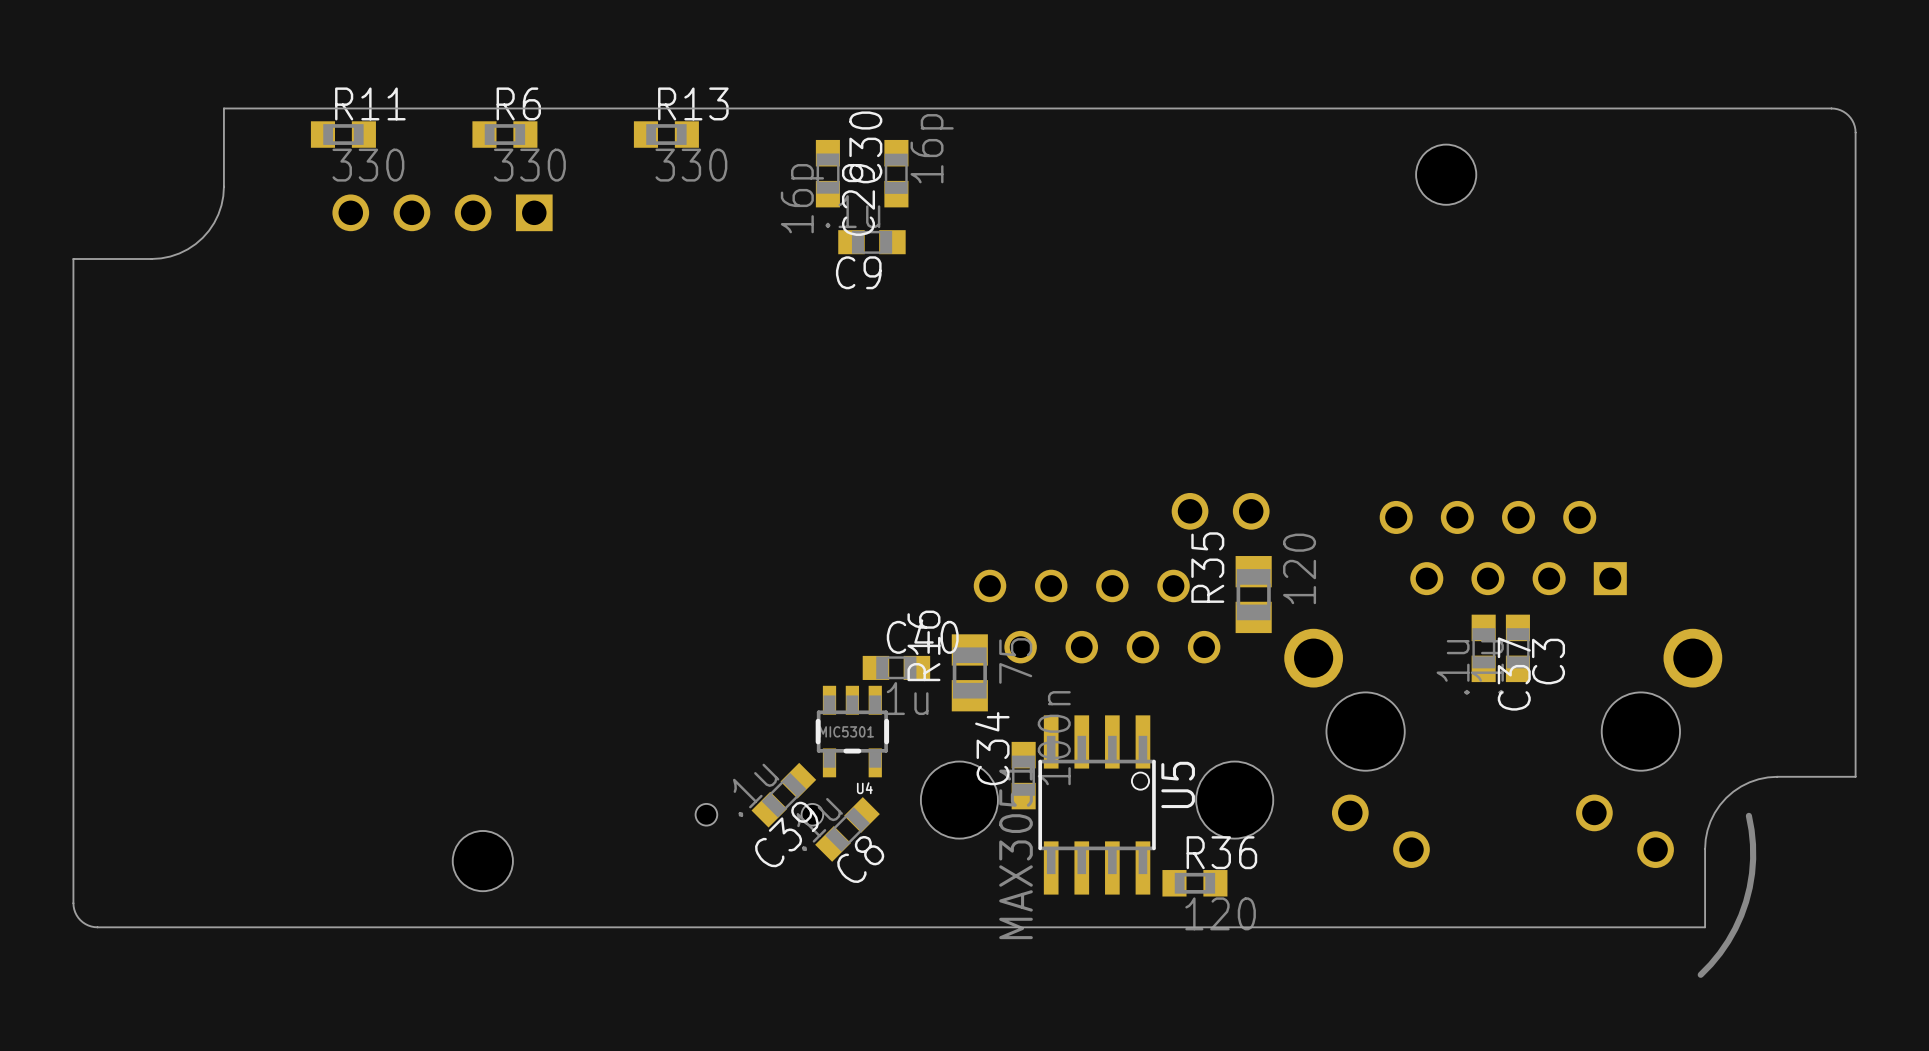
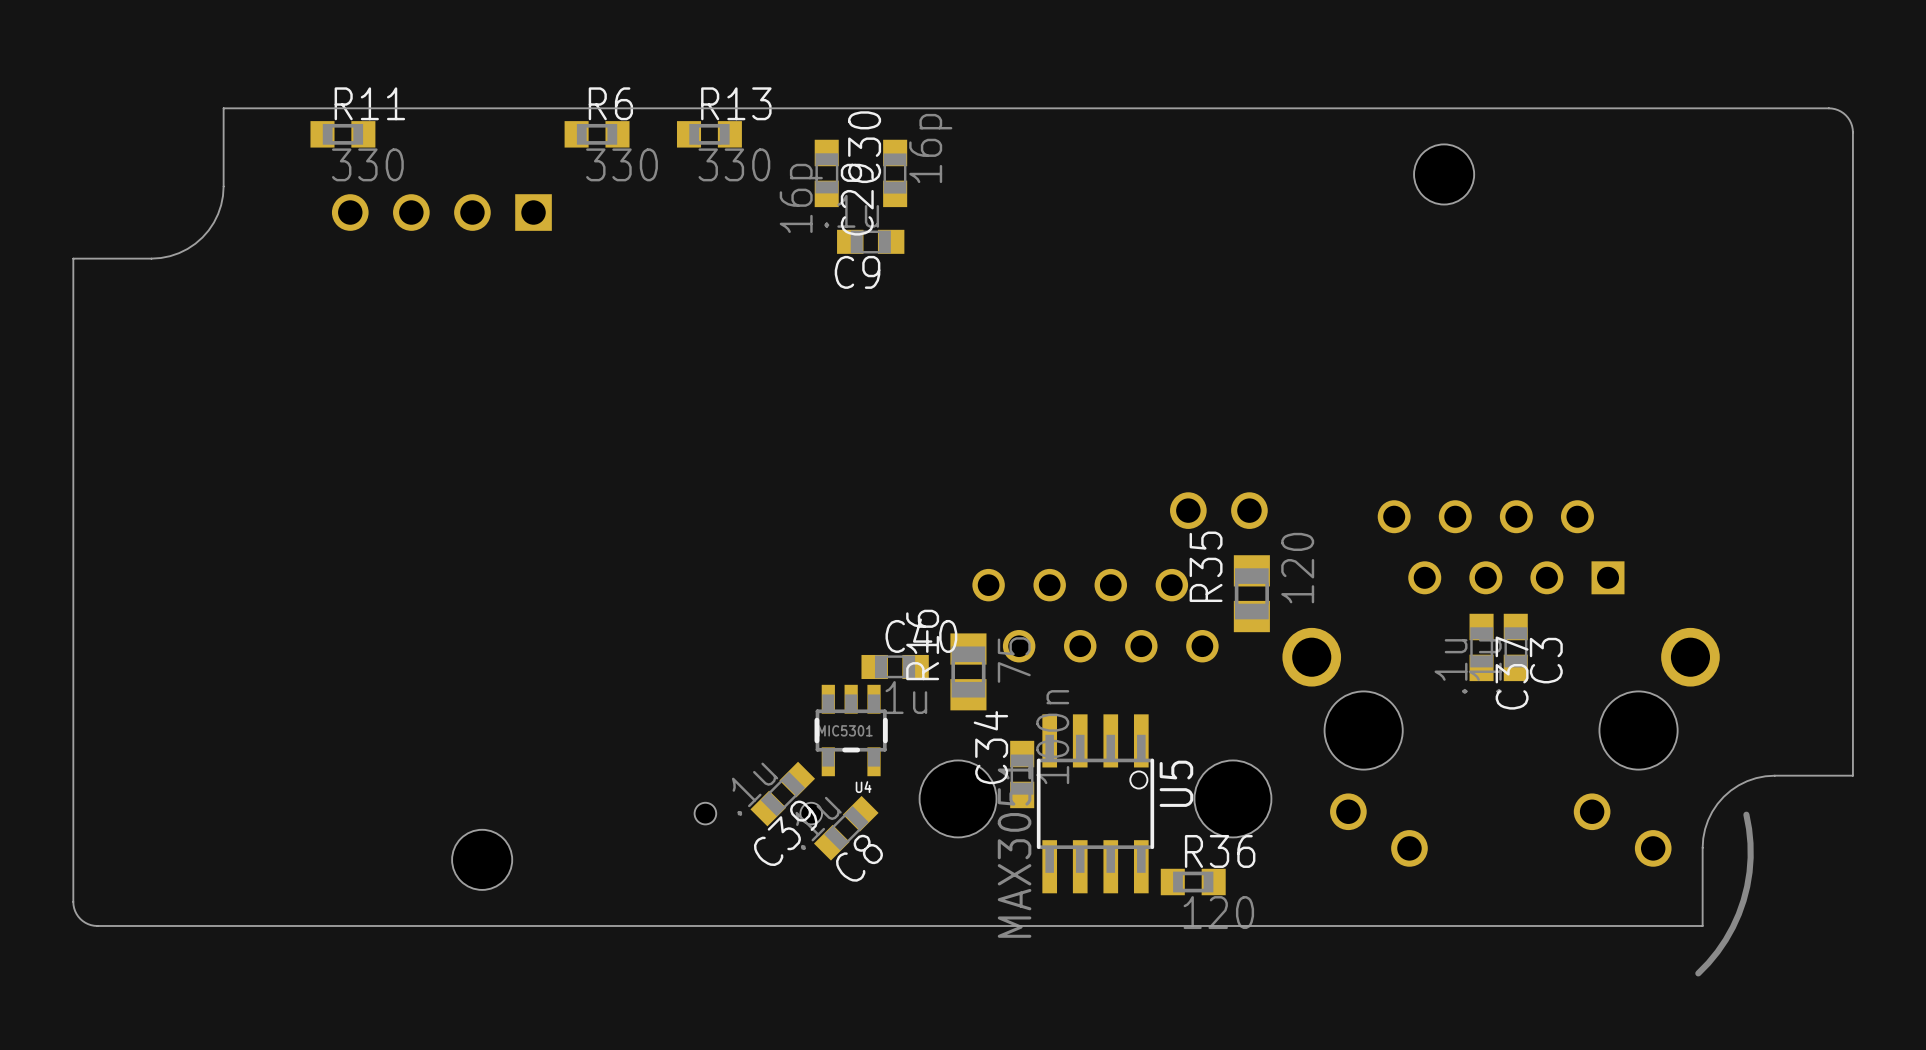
R6 position: (504, 134) -> (597, 134)
R13 position: (666, 134) -> (709, 134)

